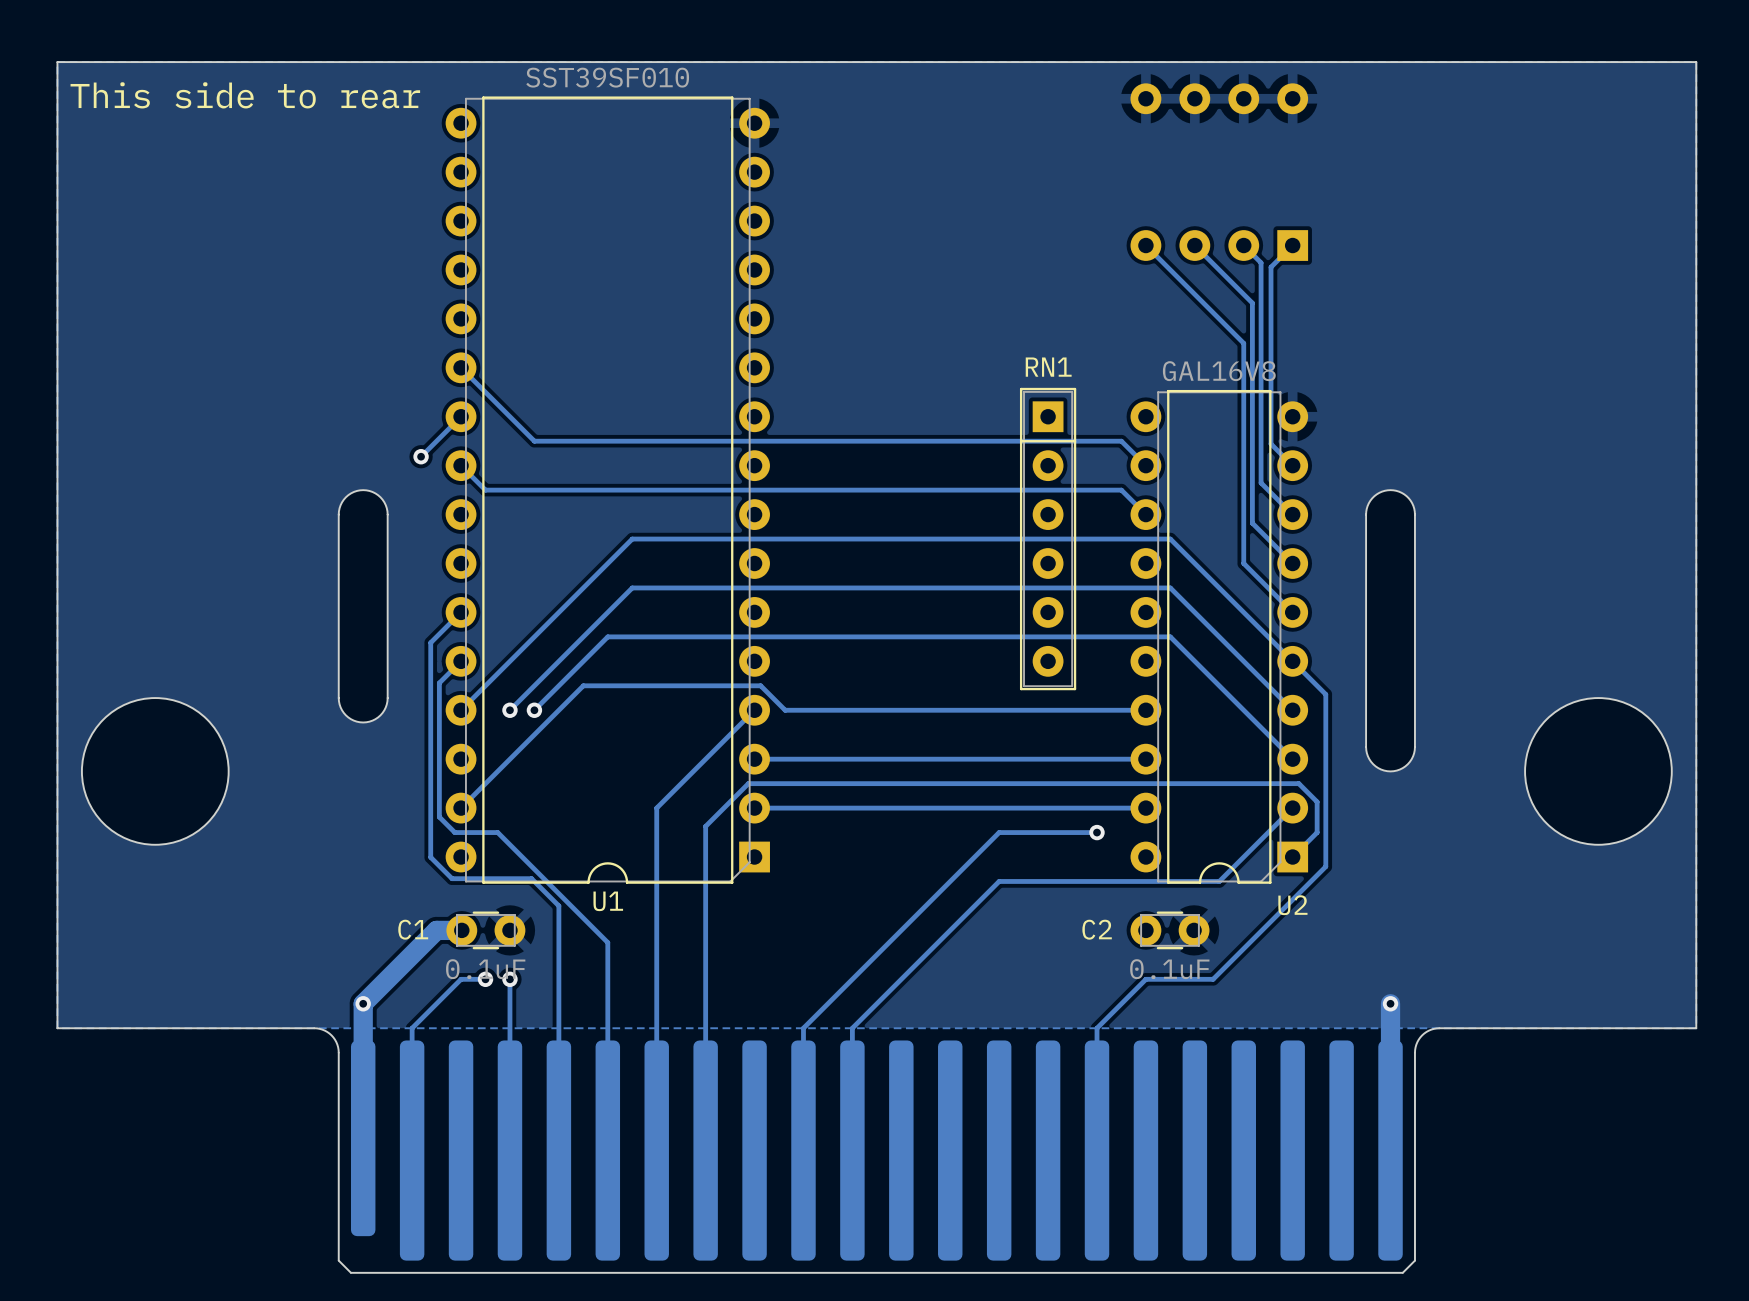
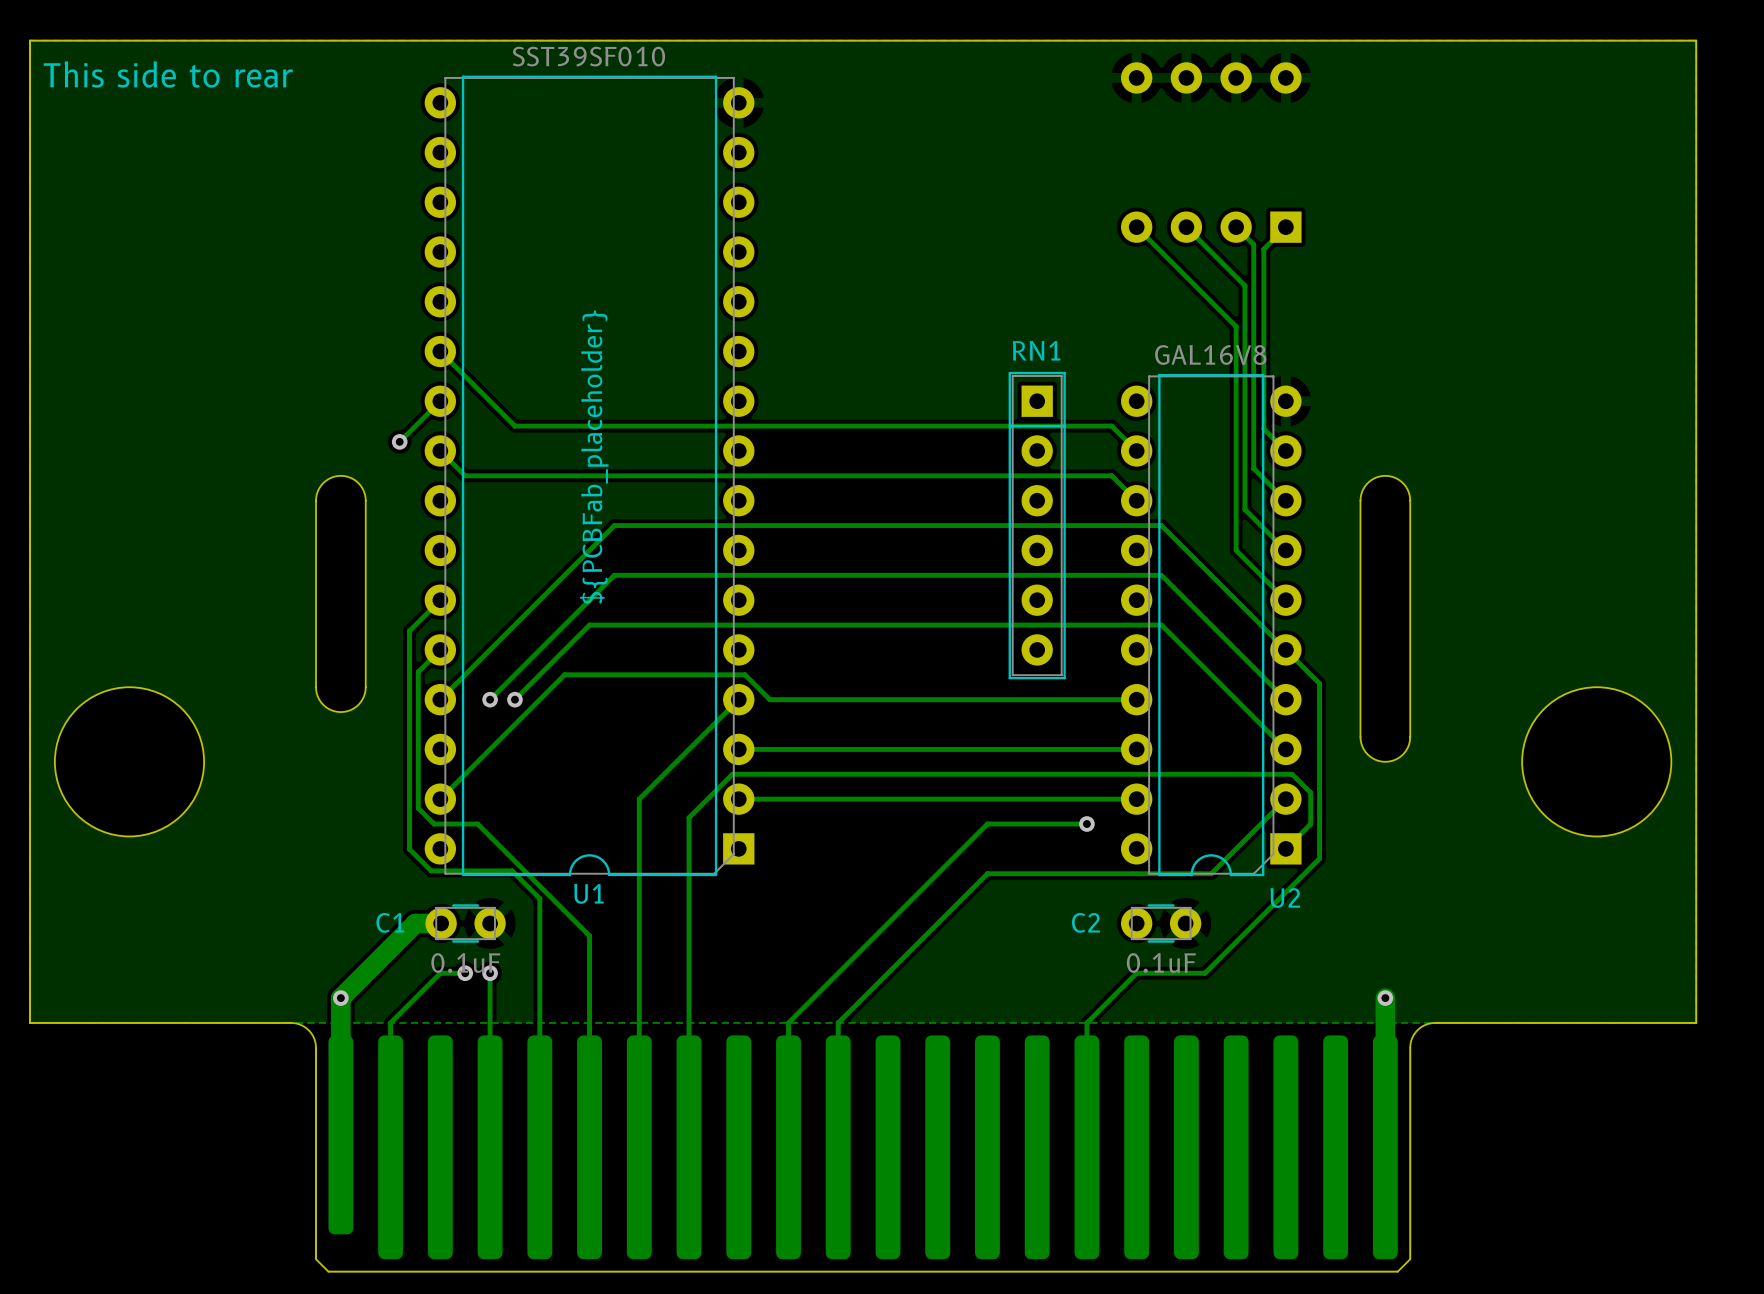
text: none -> ${PCBFab_placeholder} (594, 457)

